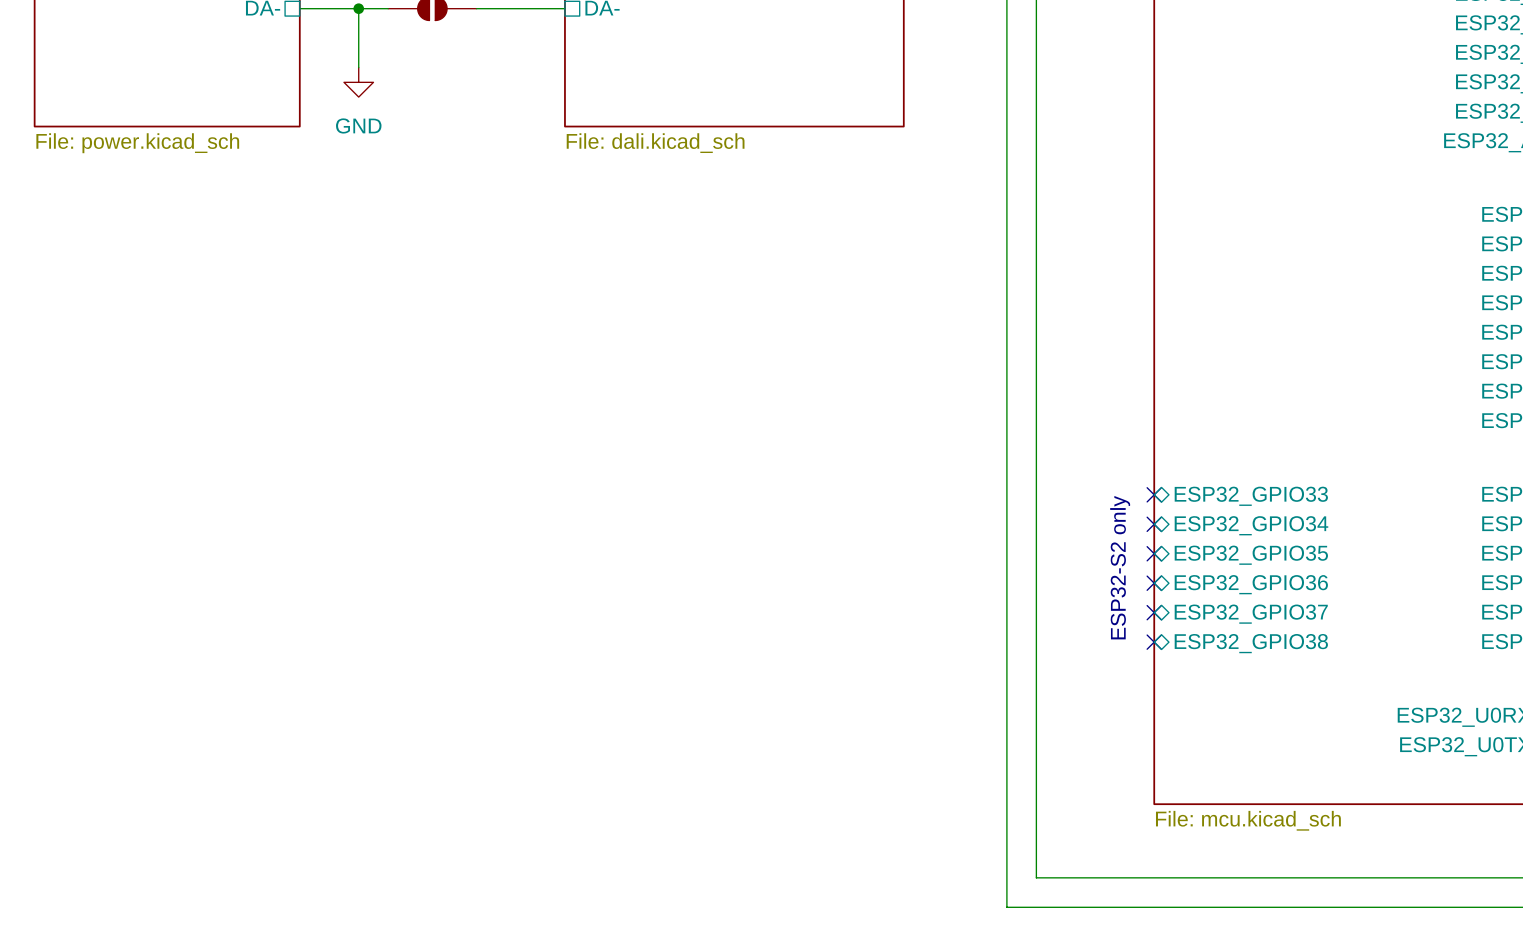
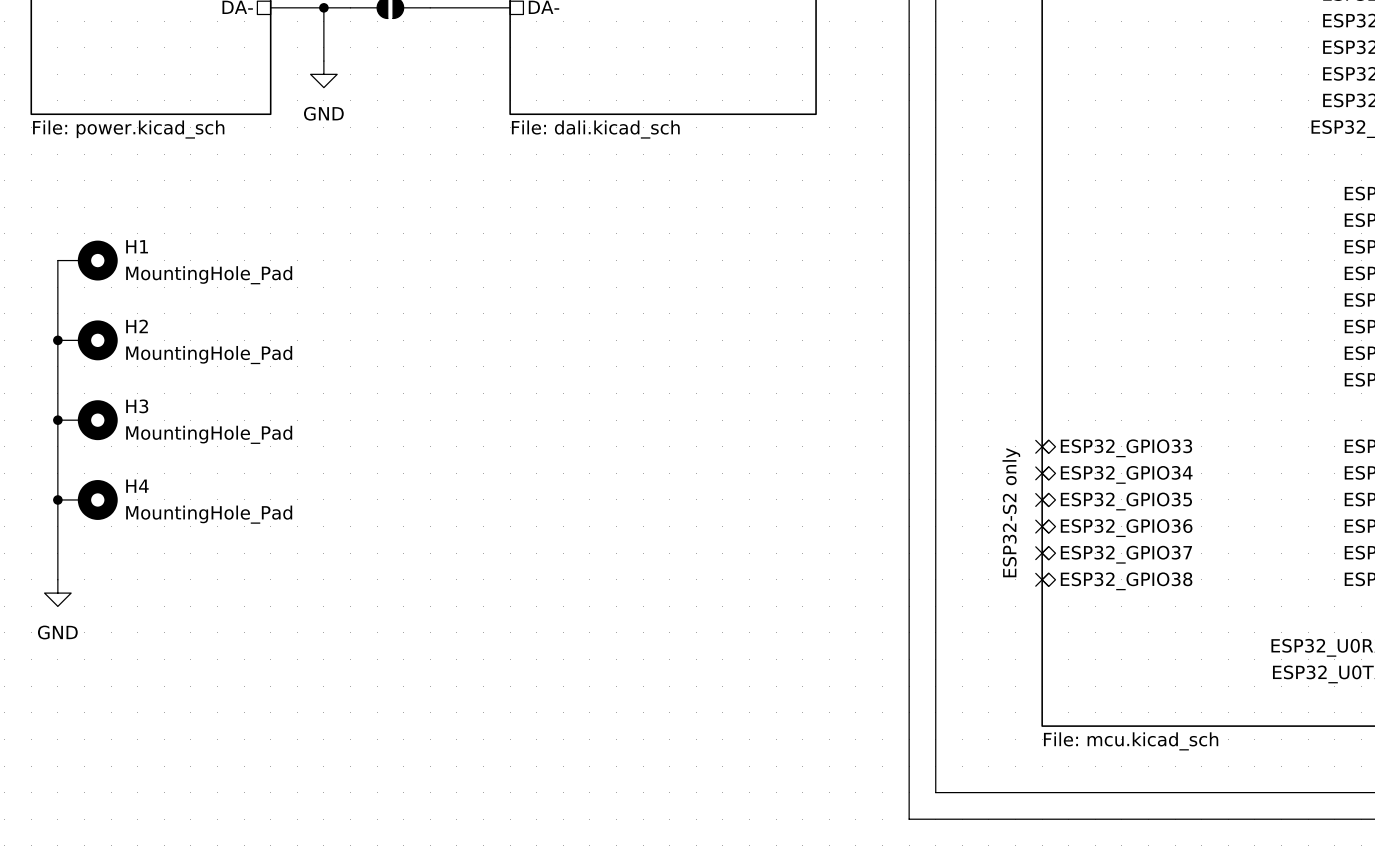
wire: none -> (57, 260) (57, 579)
H1: none -> MountingHole_Pad (87, 260)
junction: none -> (57, 340)
H2: none -> MountingHole_Pad (87, 340)
junction: none -> (57, 420)
H3: none -> MountingHole_Pad (87, 420)
junction: none -> (57, 499)
H4: none -> MountingHole_Pad (87, 499)
power symbol: none -> GND (57, 593)

